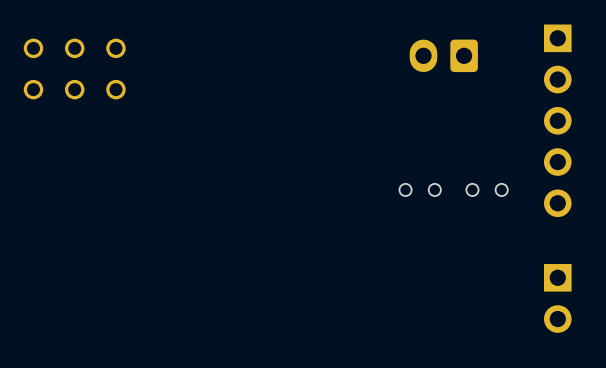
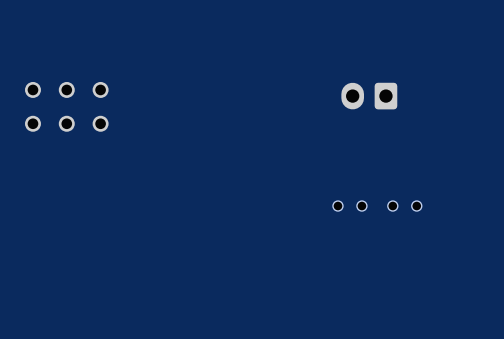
part: (557, 120) -> none
part: (557, 298) -> none

